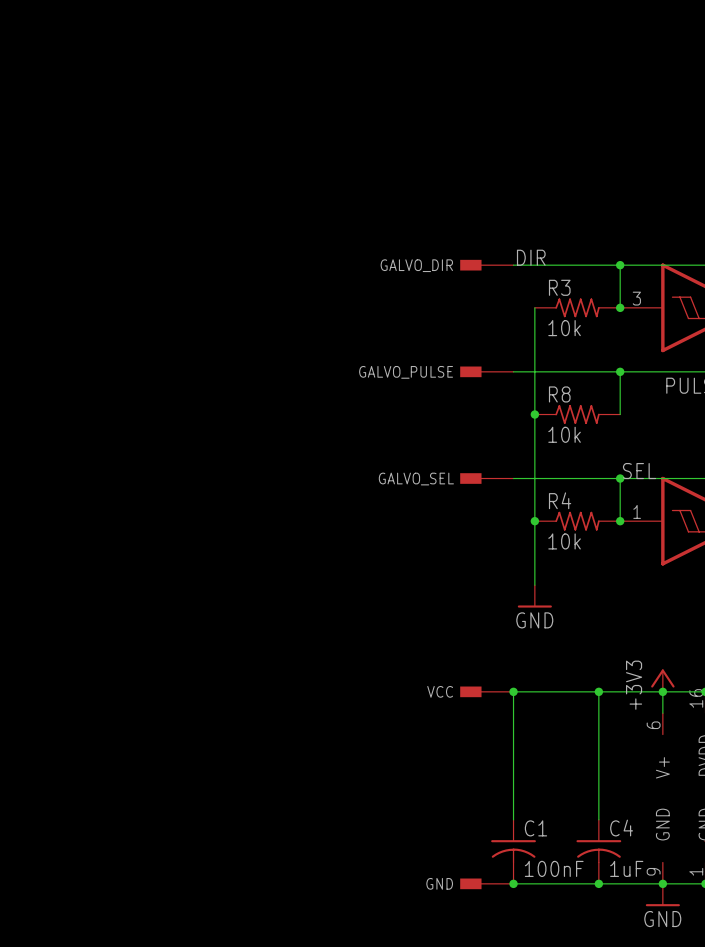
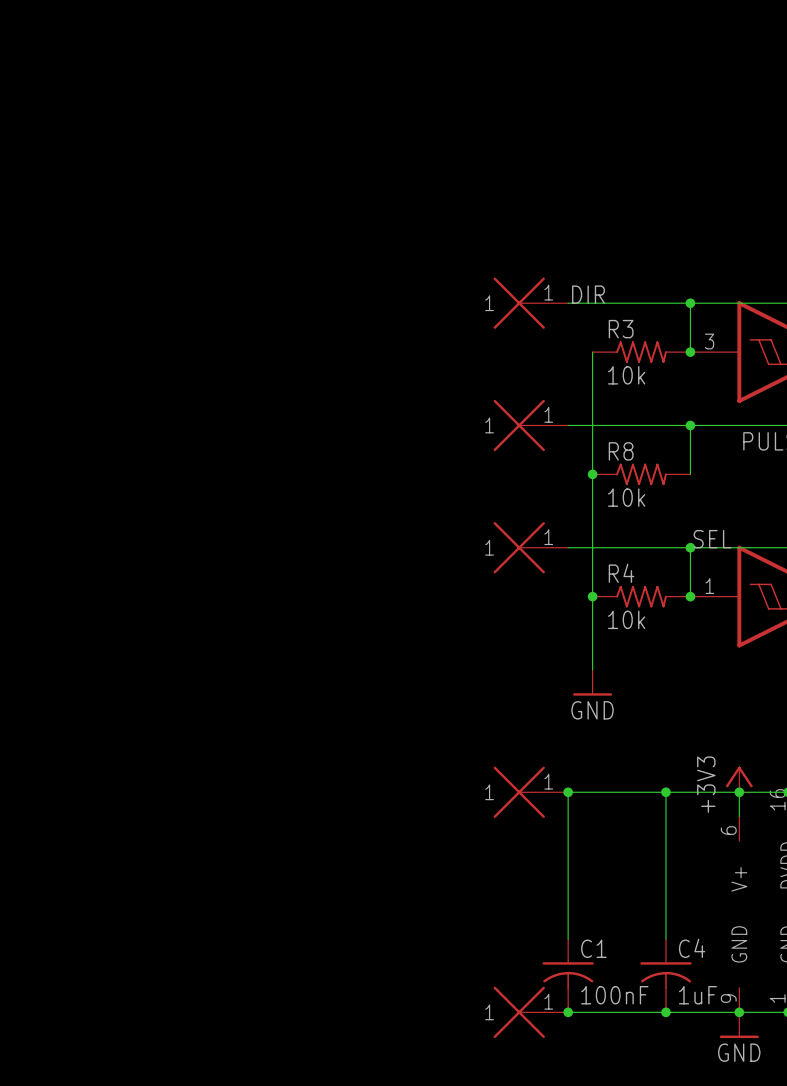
part: none -> (530, 303)
GALVO_DIR: (486, 265) -> none
part: none -> (530, 425)
GALVO_PULSE: (486, 371) -> none
part: none -> (530, 547)
GALVO_SEL: (486, 478) -> none
part: none -> (530, 792)
VCC: (486, 691) -> none
part: none -> (530, 1012)
GND: (486, 883) -> none

